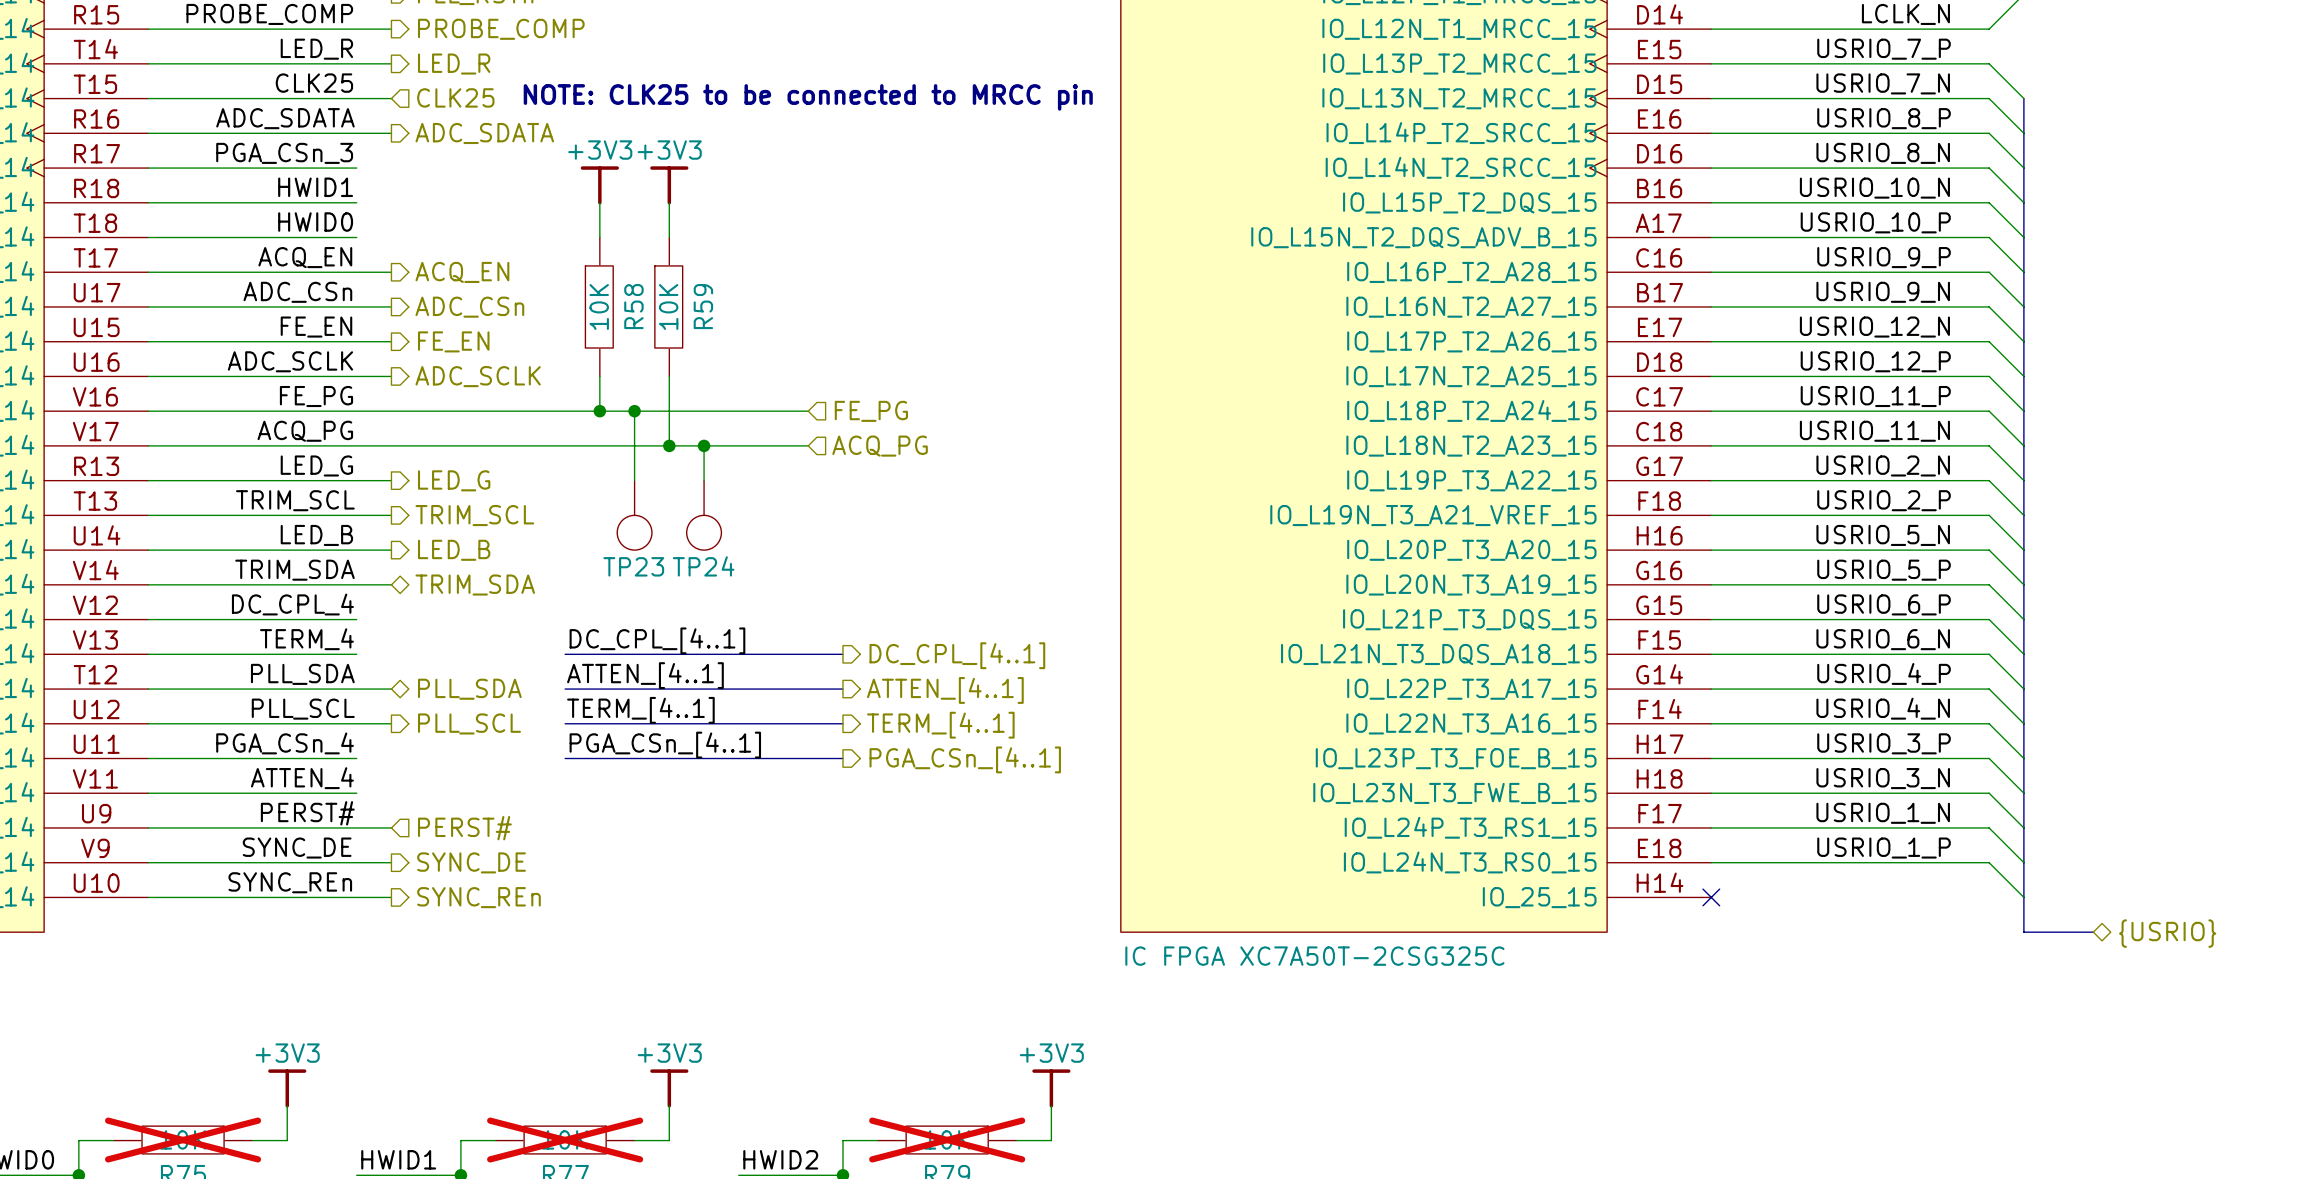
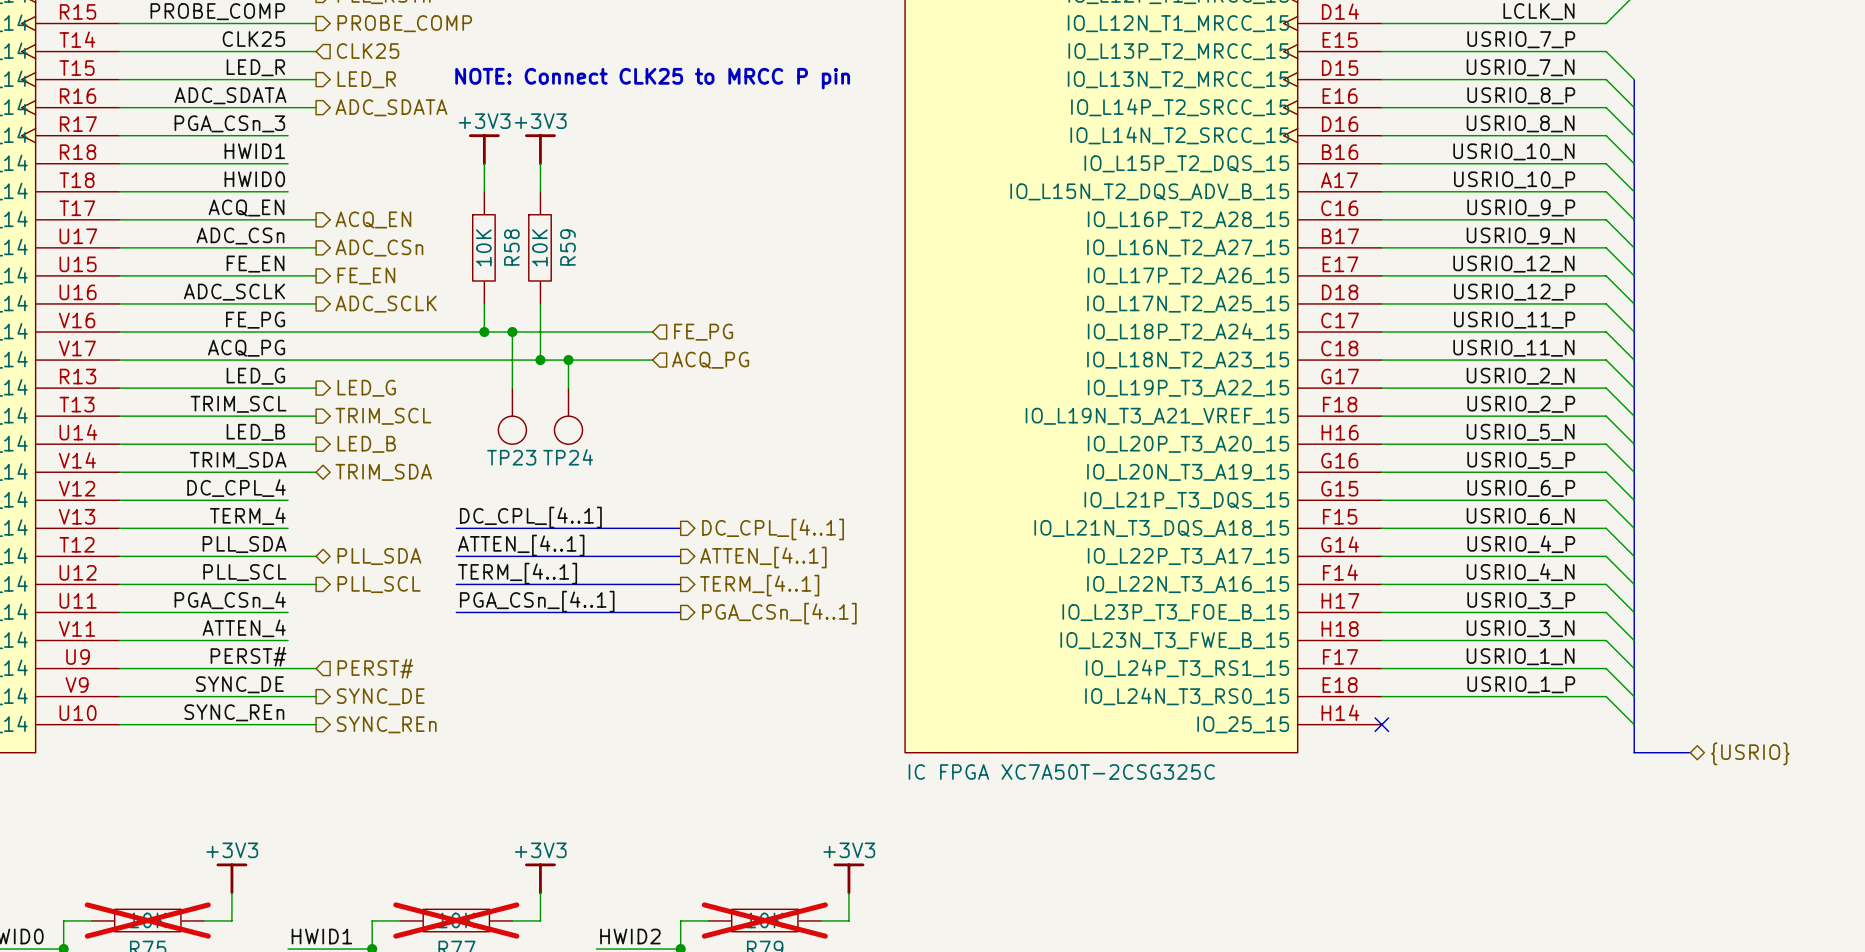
label: LED_R (316, 49) -> CLK25 (253, 39)
hierarchical label shape: output (454, 64) -> input (368, 51)
hierarchical label: LED_R (454, 64) -> CLK25 (368, 51)
label: CLK25 (314, 83) -> LED_R (255, 67)
hierarchical label shape: input (455, 97) -> output (366, 79)
hierarchical label: CLK25 (455, 97) -> LED_R (366, 79)
text: NOTE: CLK25 to be connected to MRCC pin (808, 97) -> NOTE: Connect CLK25 to MRCC P pin (652, 78)

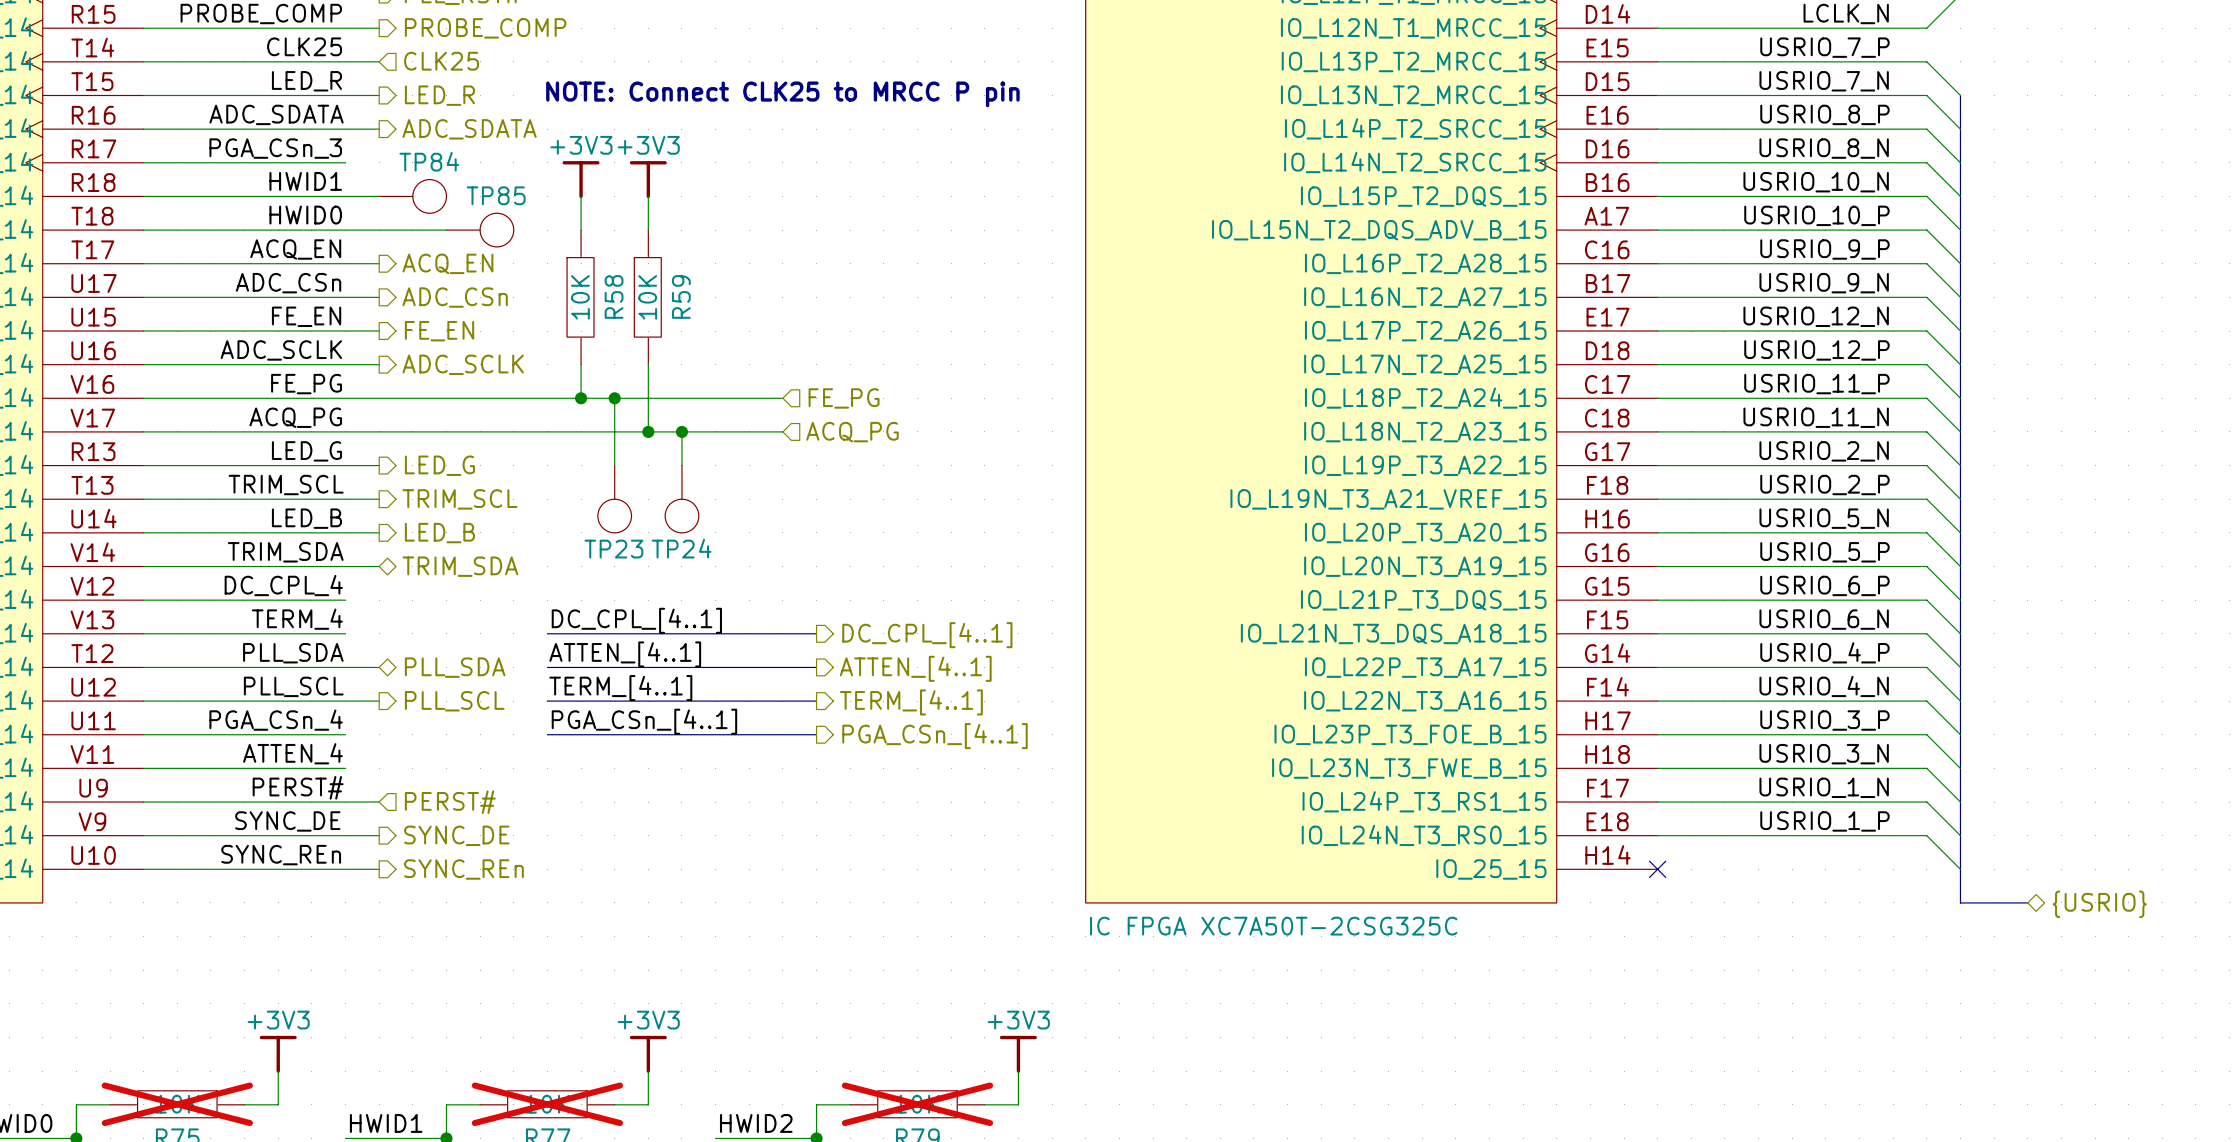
wire: none -> (345, 196) (379, 196)
TP84: none -> (412, 196)
wire: none -> (345, 230) (446, 230)
TP85: none -> (480, 230)

